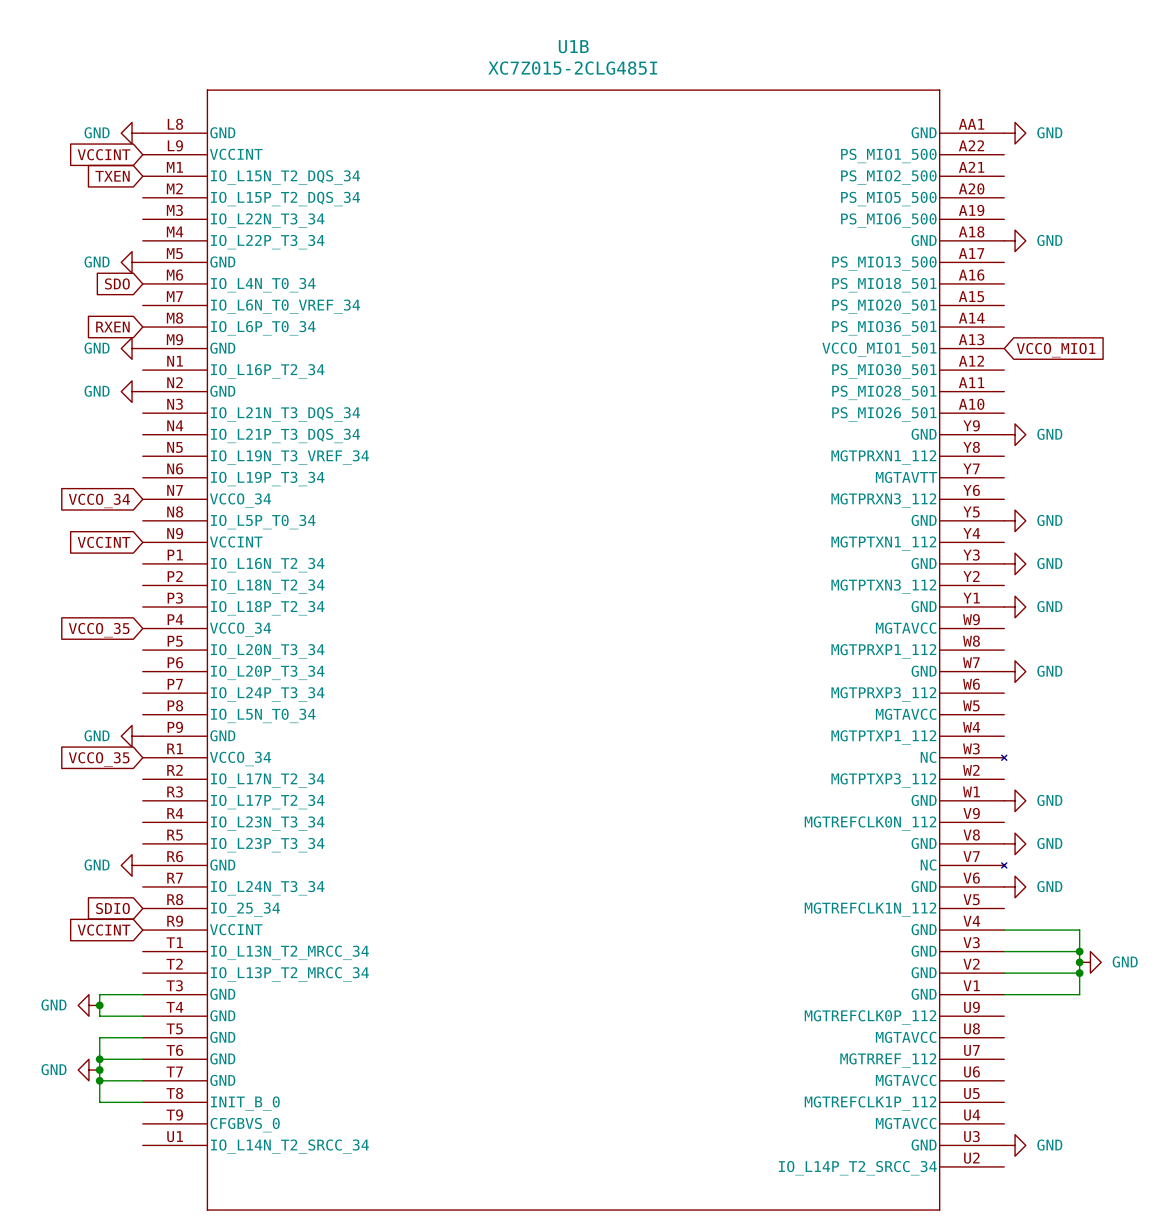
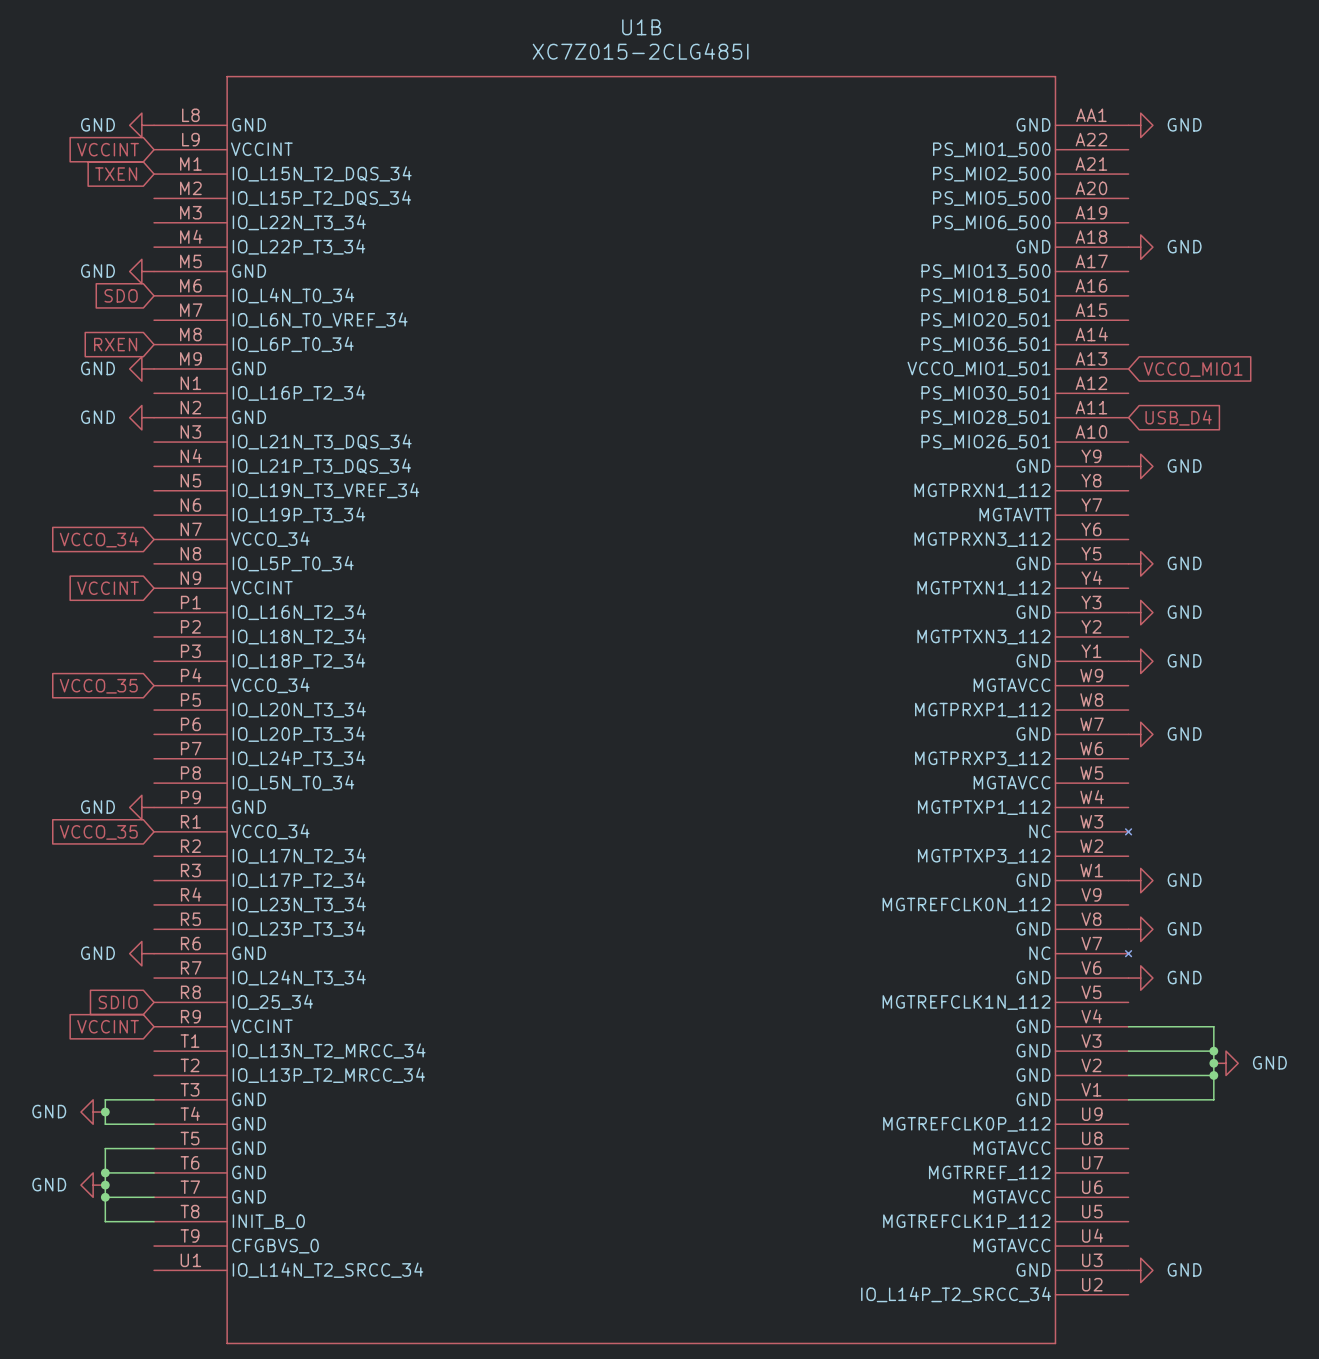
global label: none -> USB_D4 (1178, 417)

